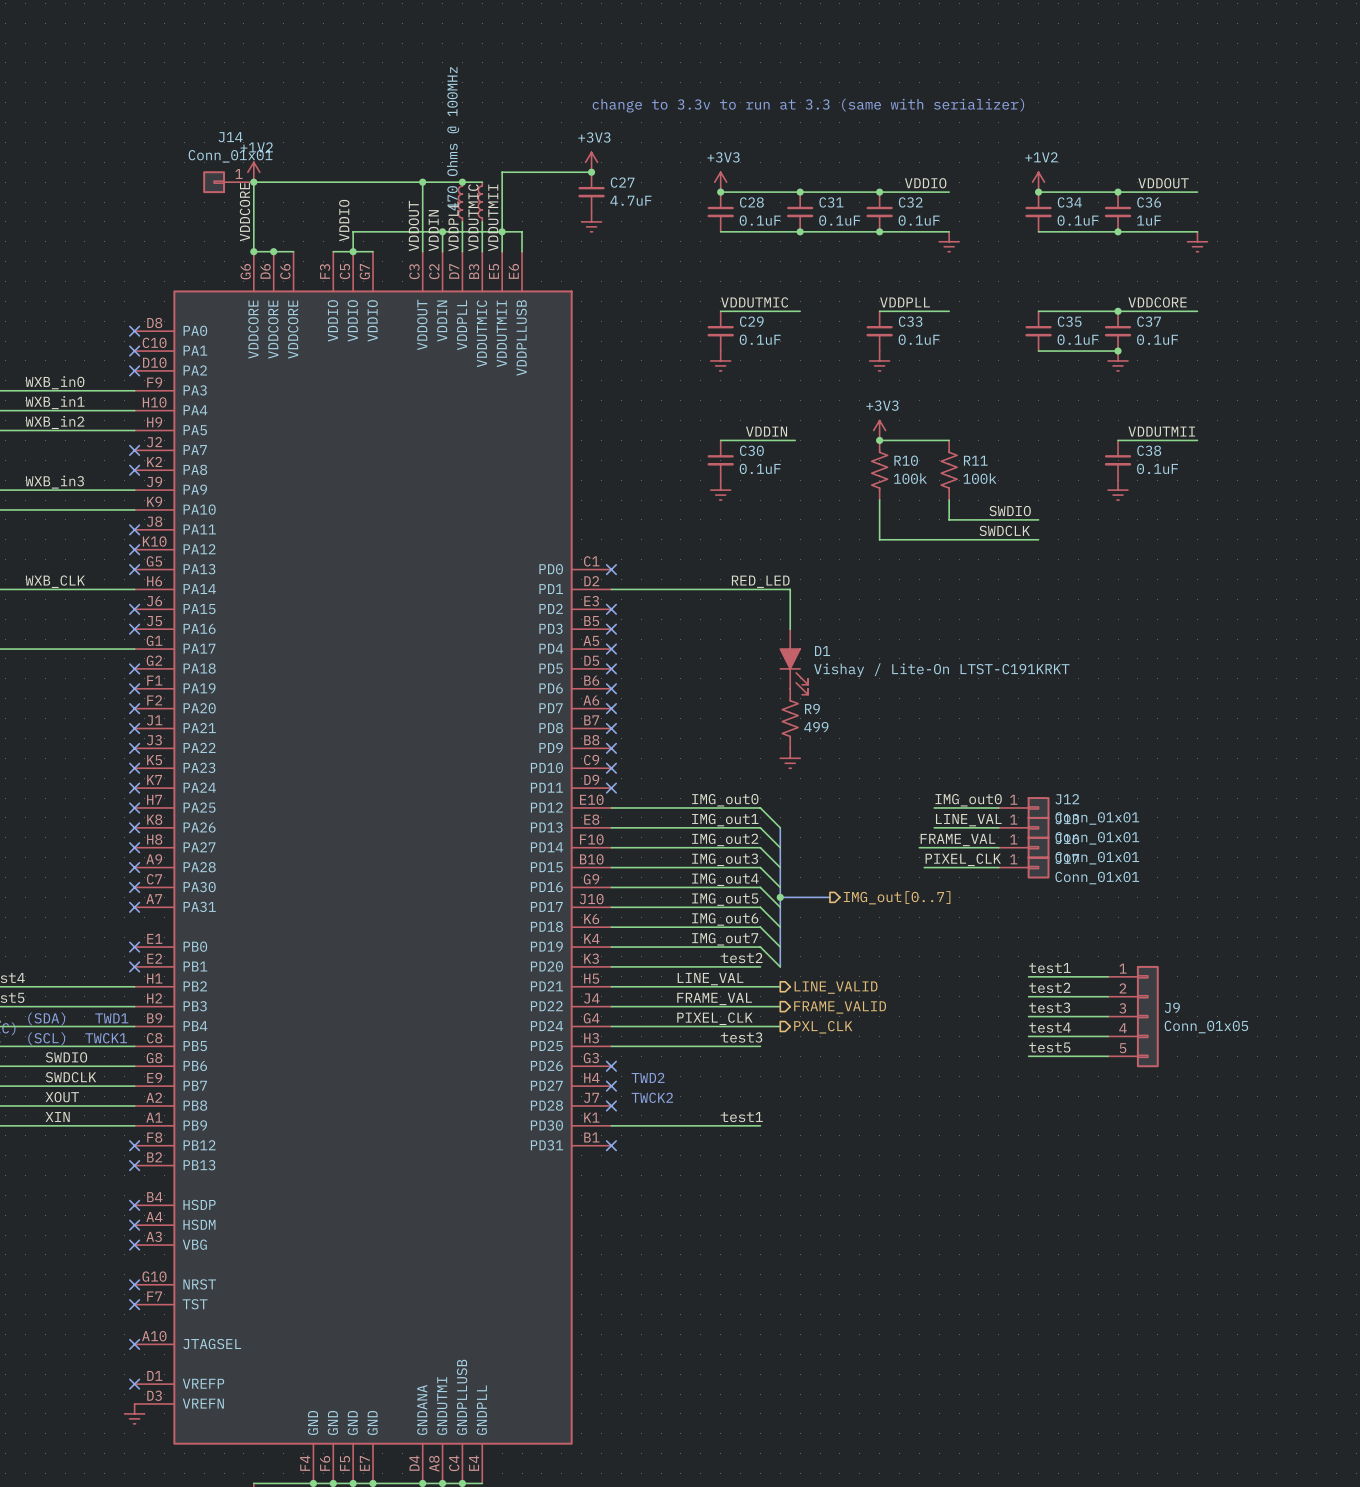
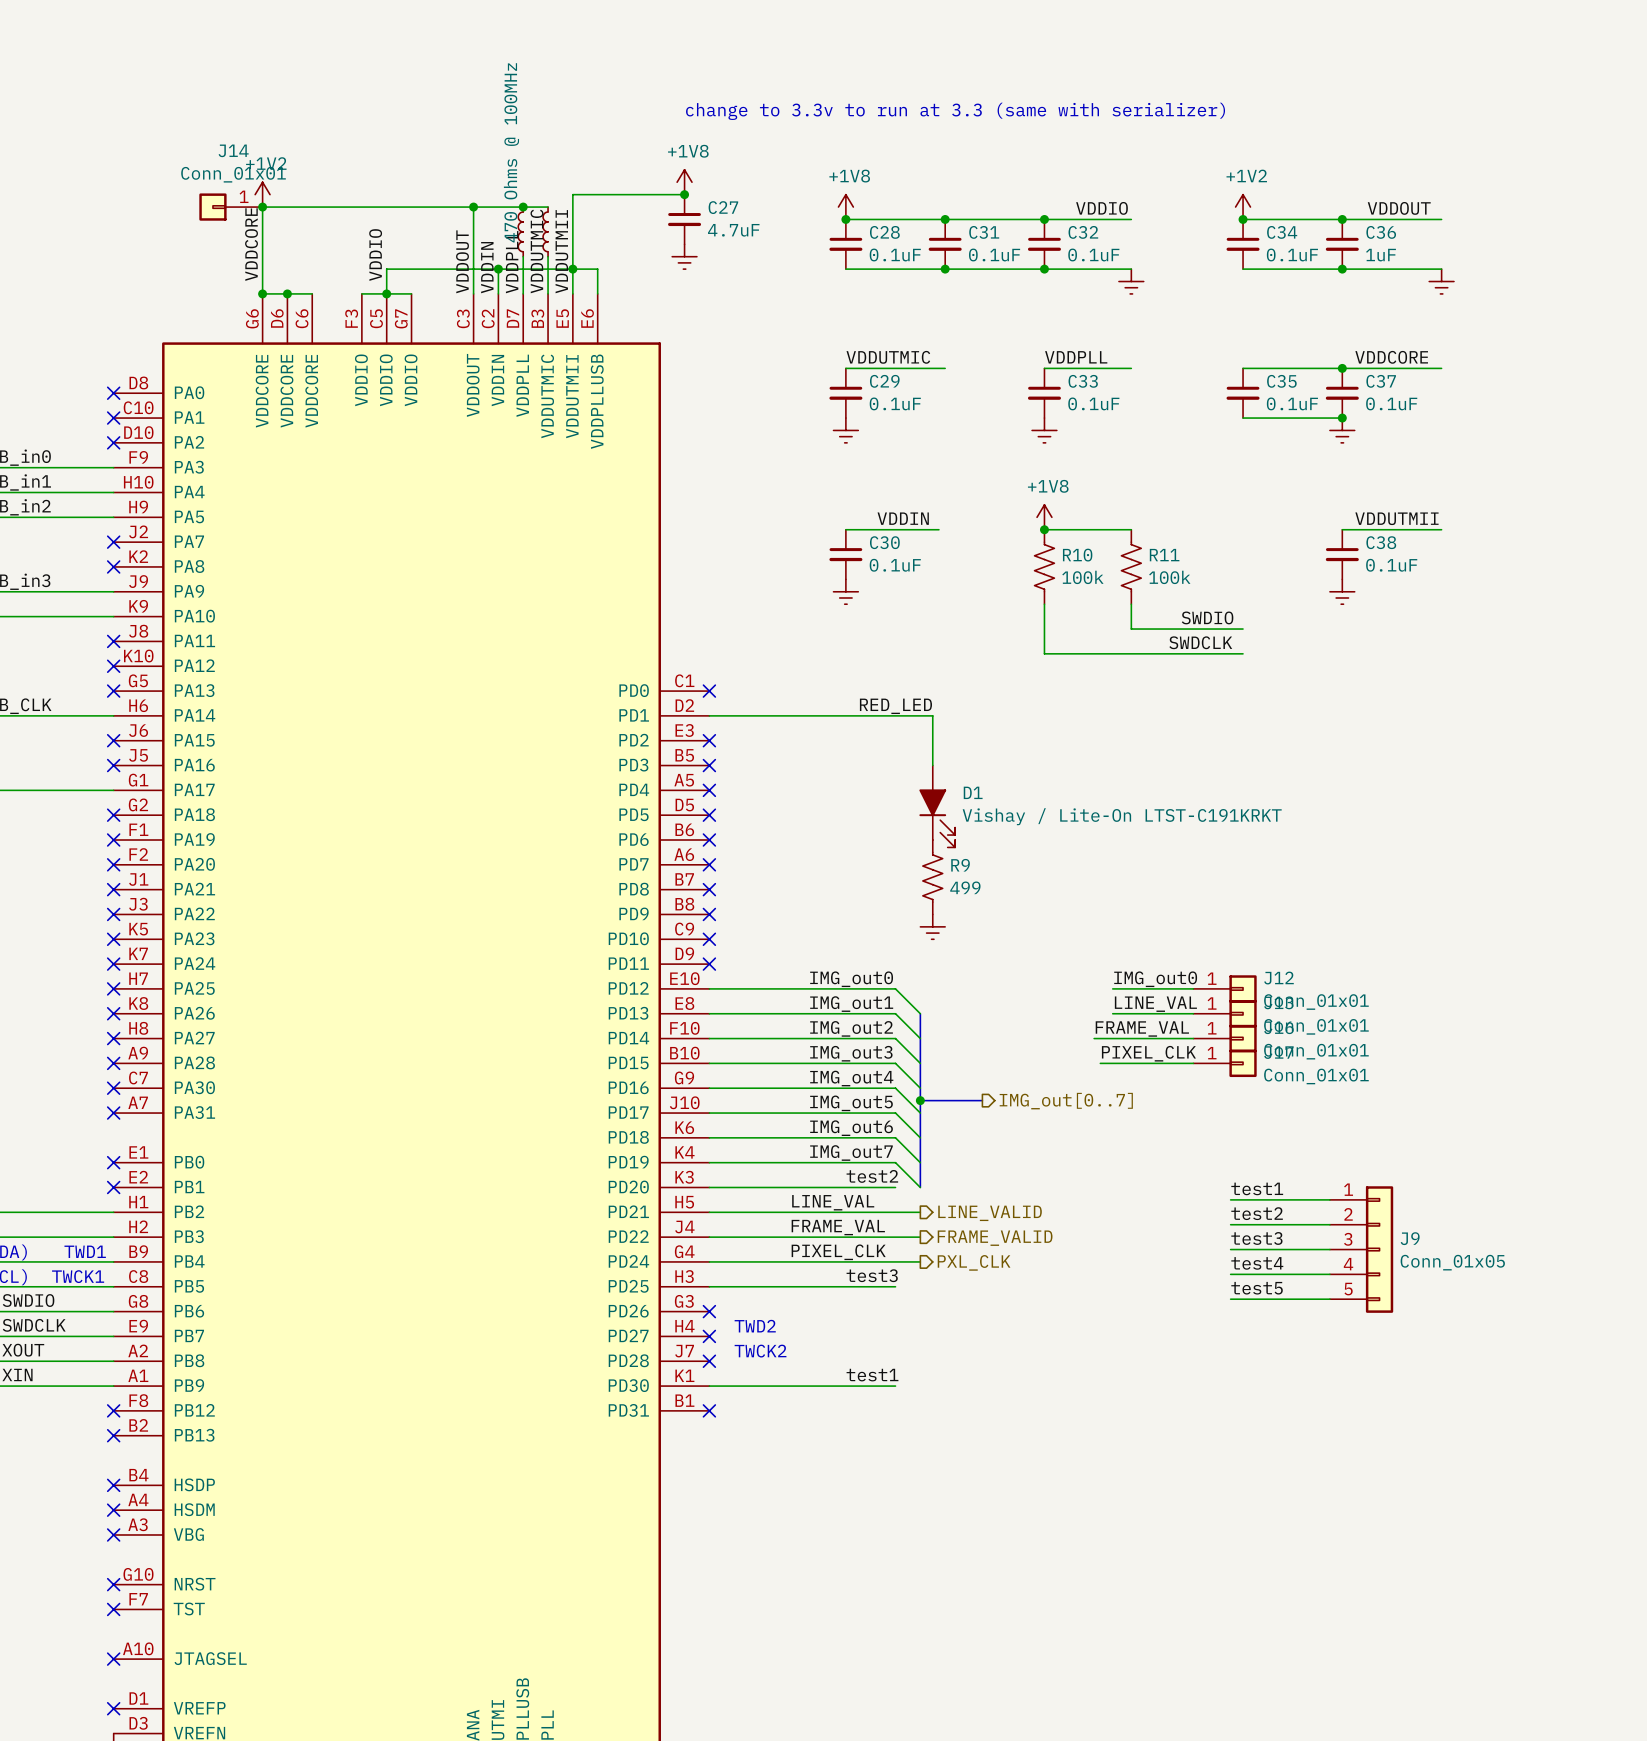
power symbol: +3V3 (591, 162) -> +1V8 (684, 182)
power symbol: +3V3 (720, 182) -> +1V8 (845, 207)
power symbol: +3V3 (879, 430) -> +1V8 (1044, 517)

